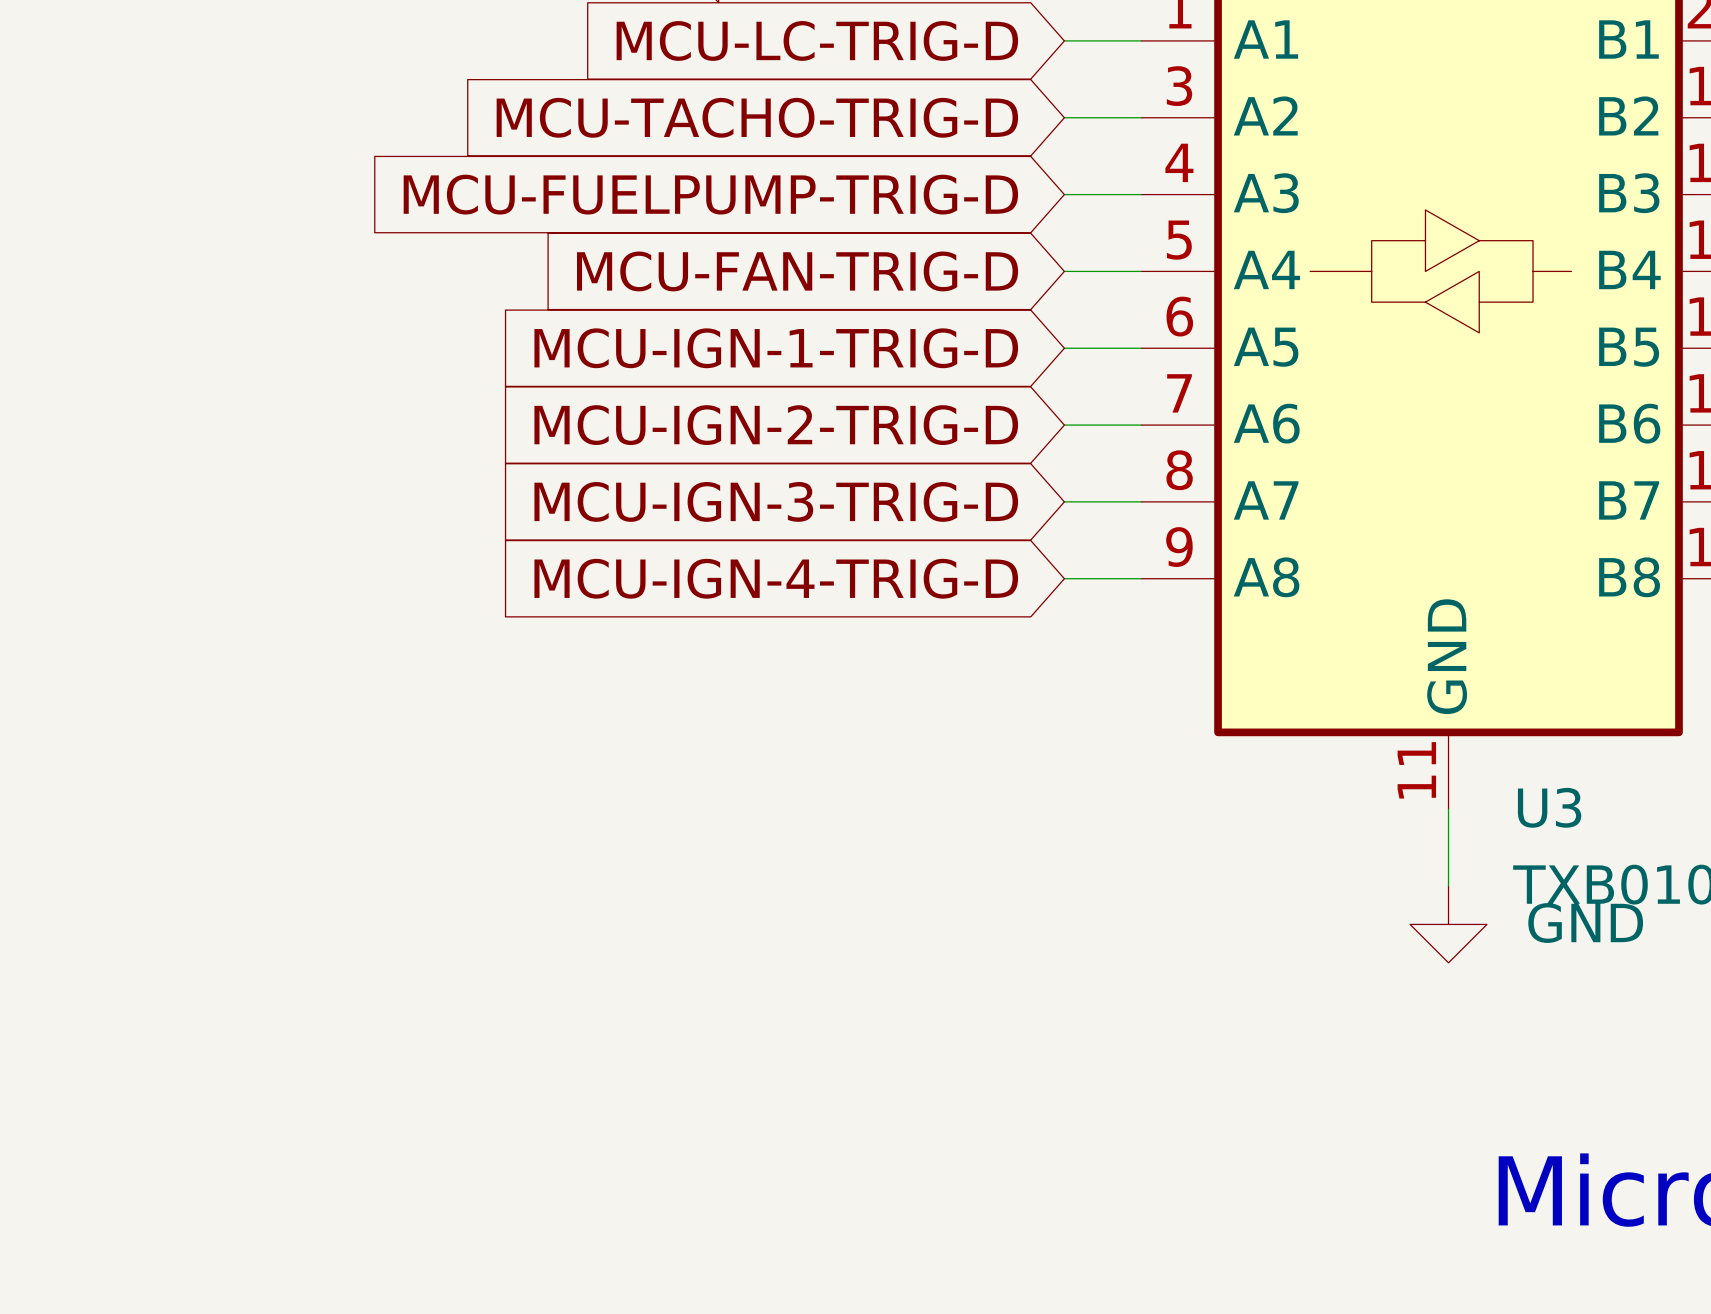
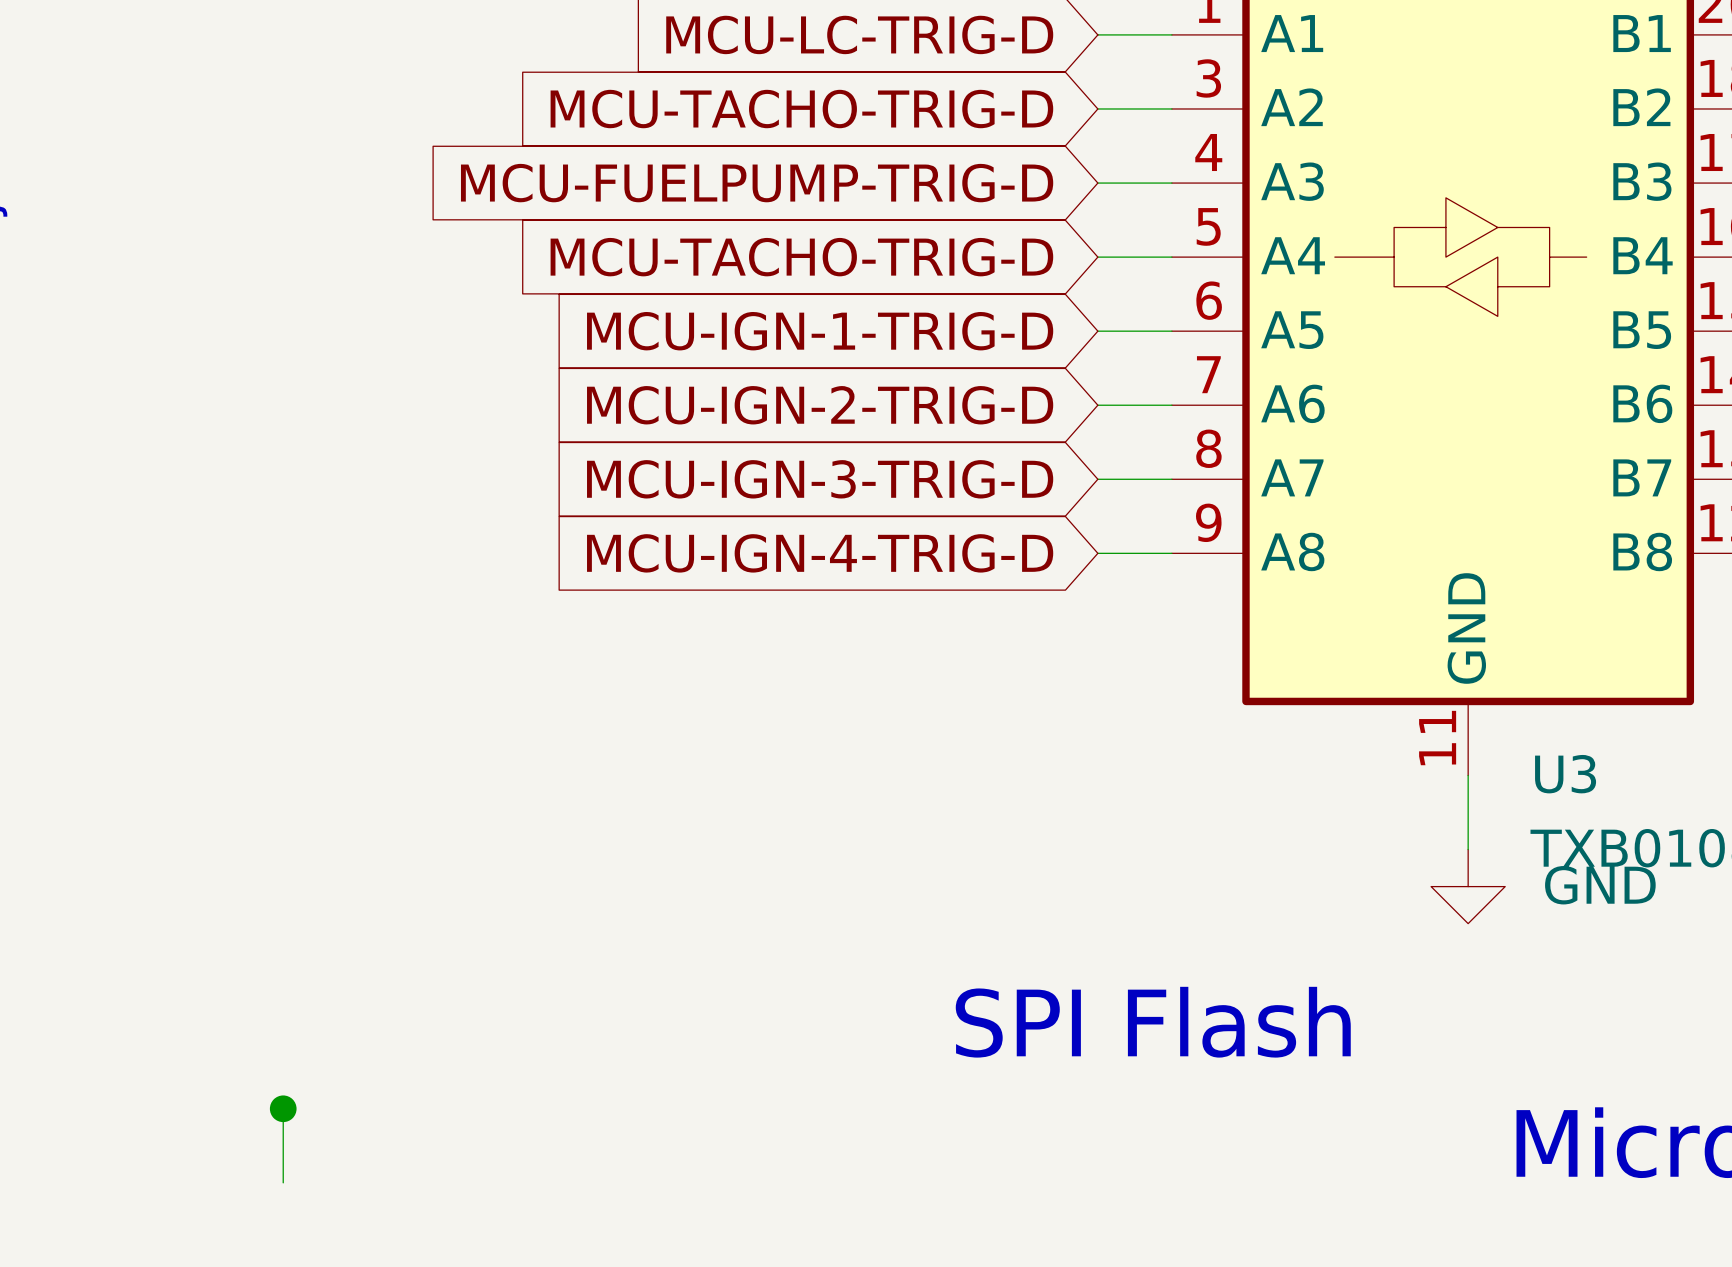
global label: MCU-FAN-TRIG-D (797, 271) -> MCU-TACHO-TRIG-D (801, 257)
text: none -> SPI Flash (1153, 1022)
wire: none -> (283, 1108) (283, 1182)
junction: none -> (283, 1108)

